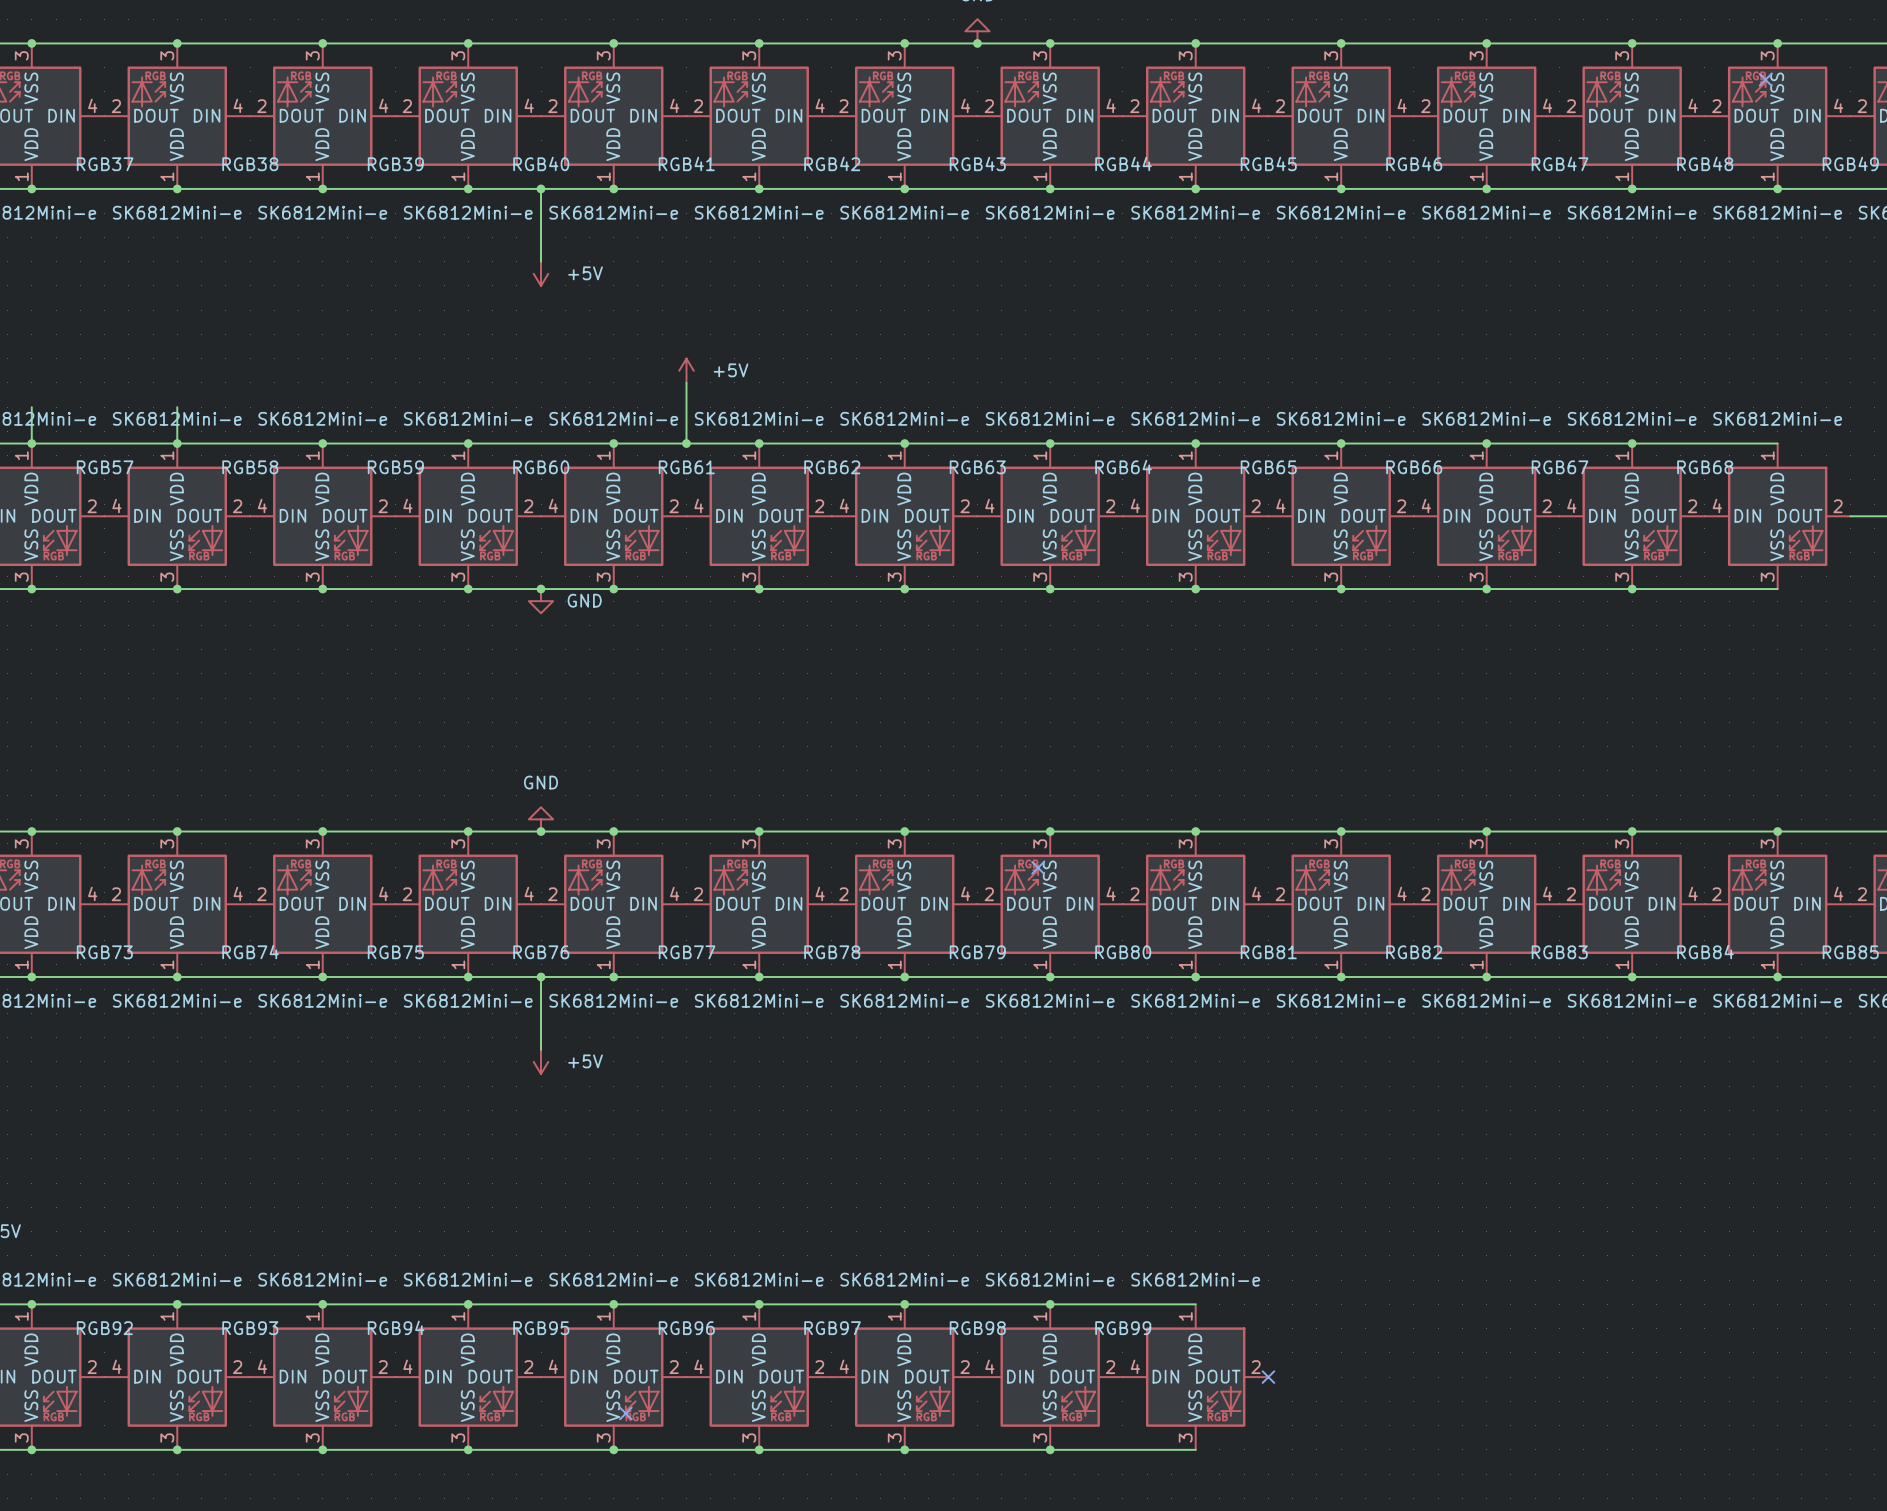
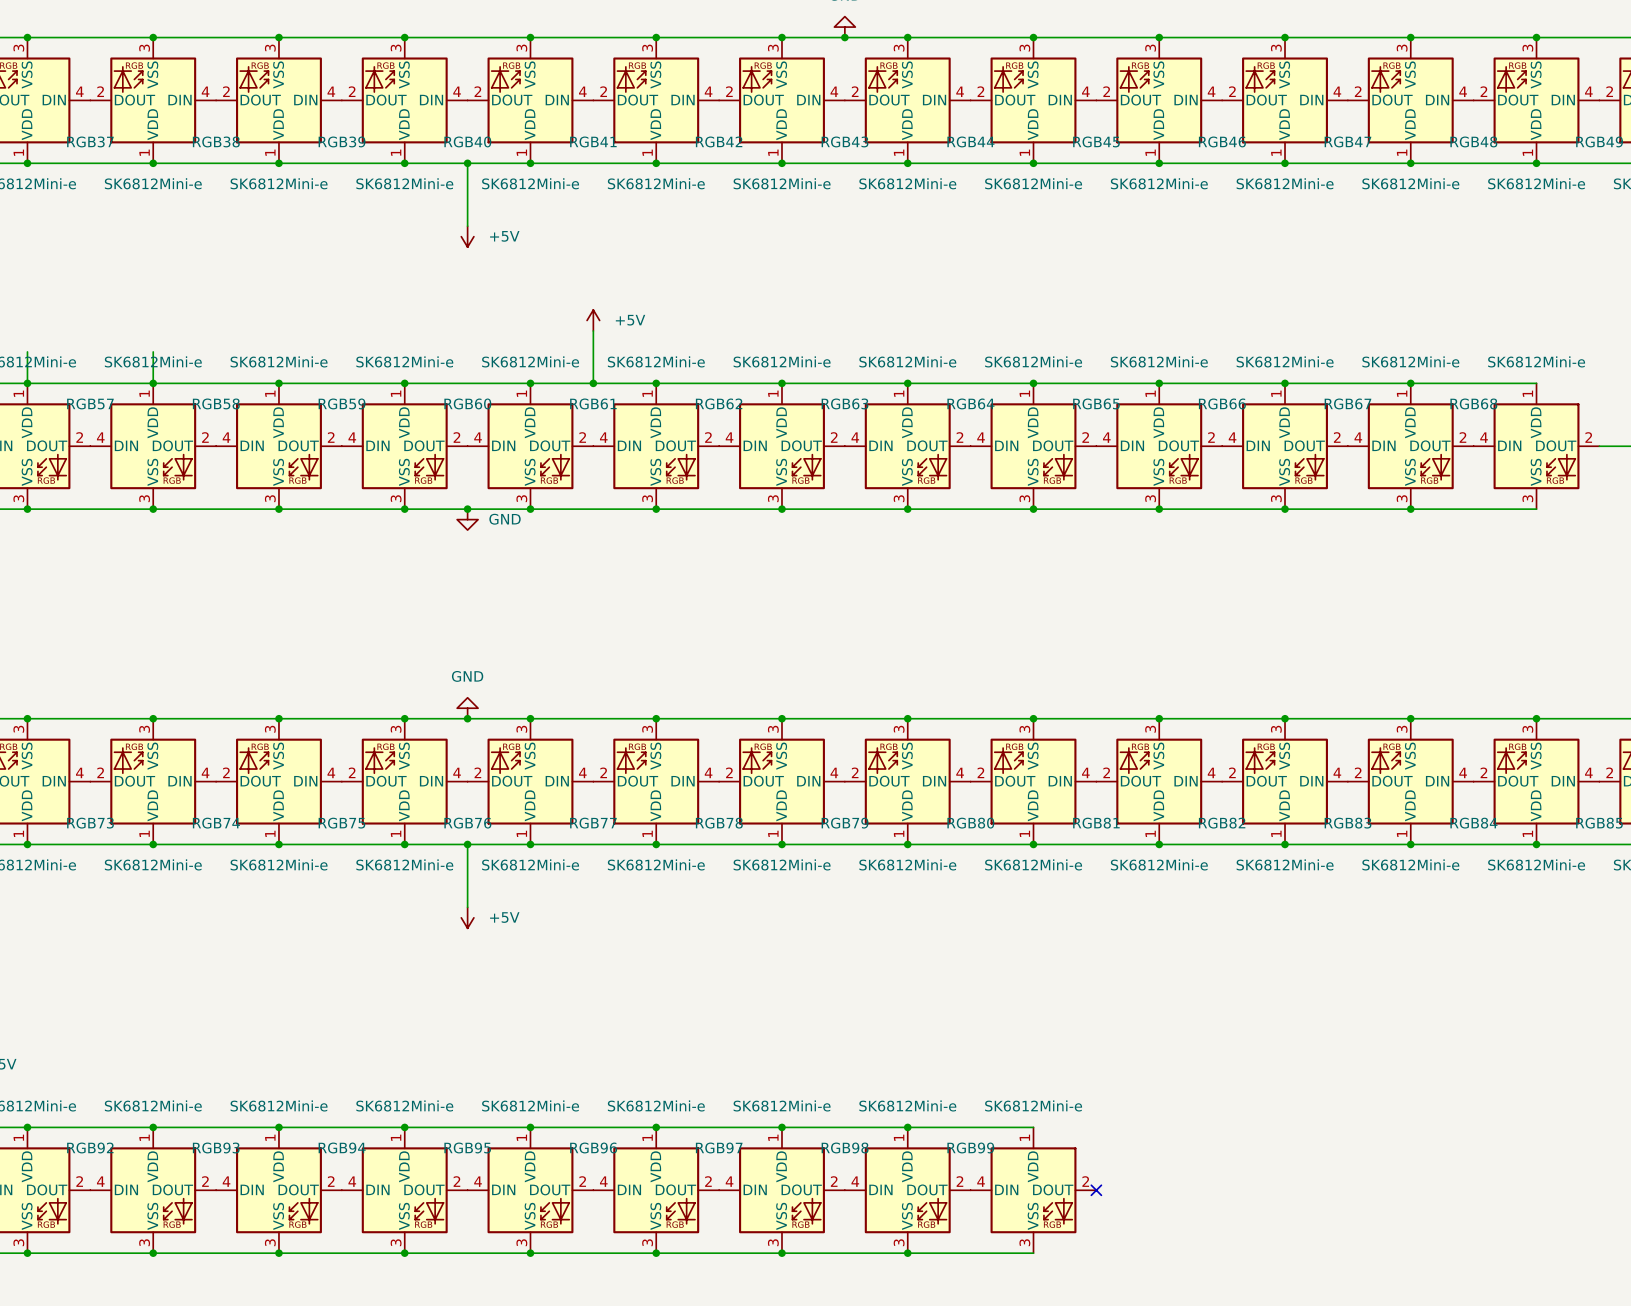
no-connect mark: (1765, 79) -> none
no-connect mark: (1038, 867) -> none
no-connect mark: (625, 1413) -> none

